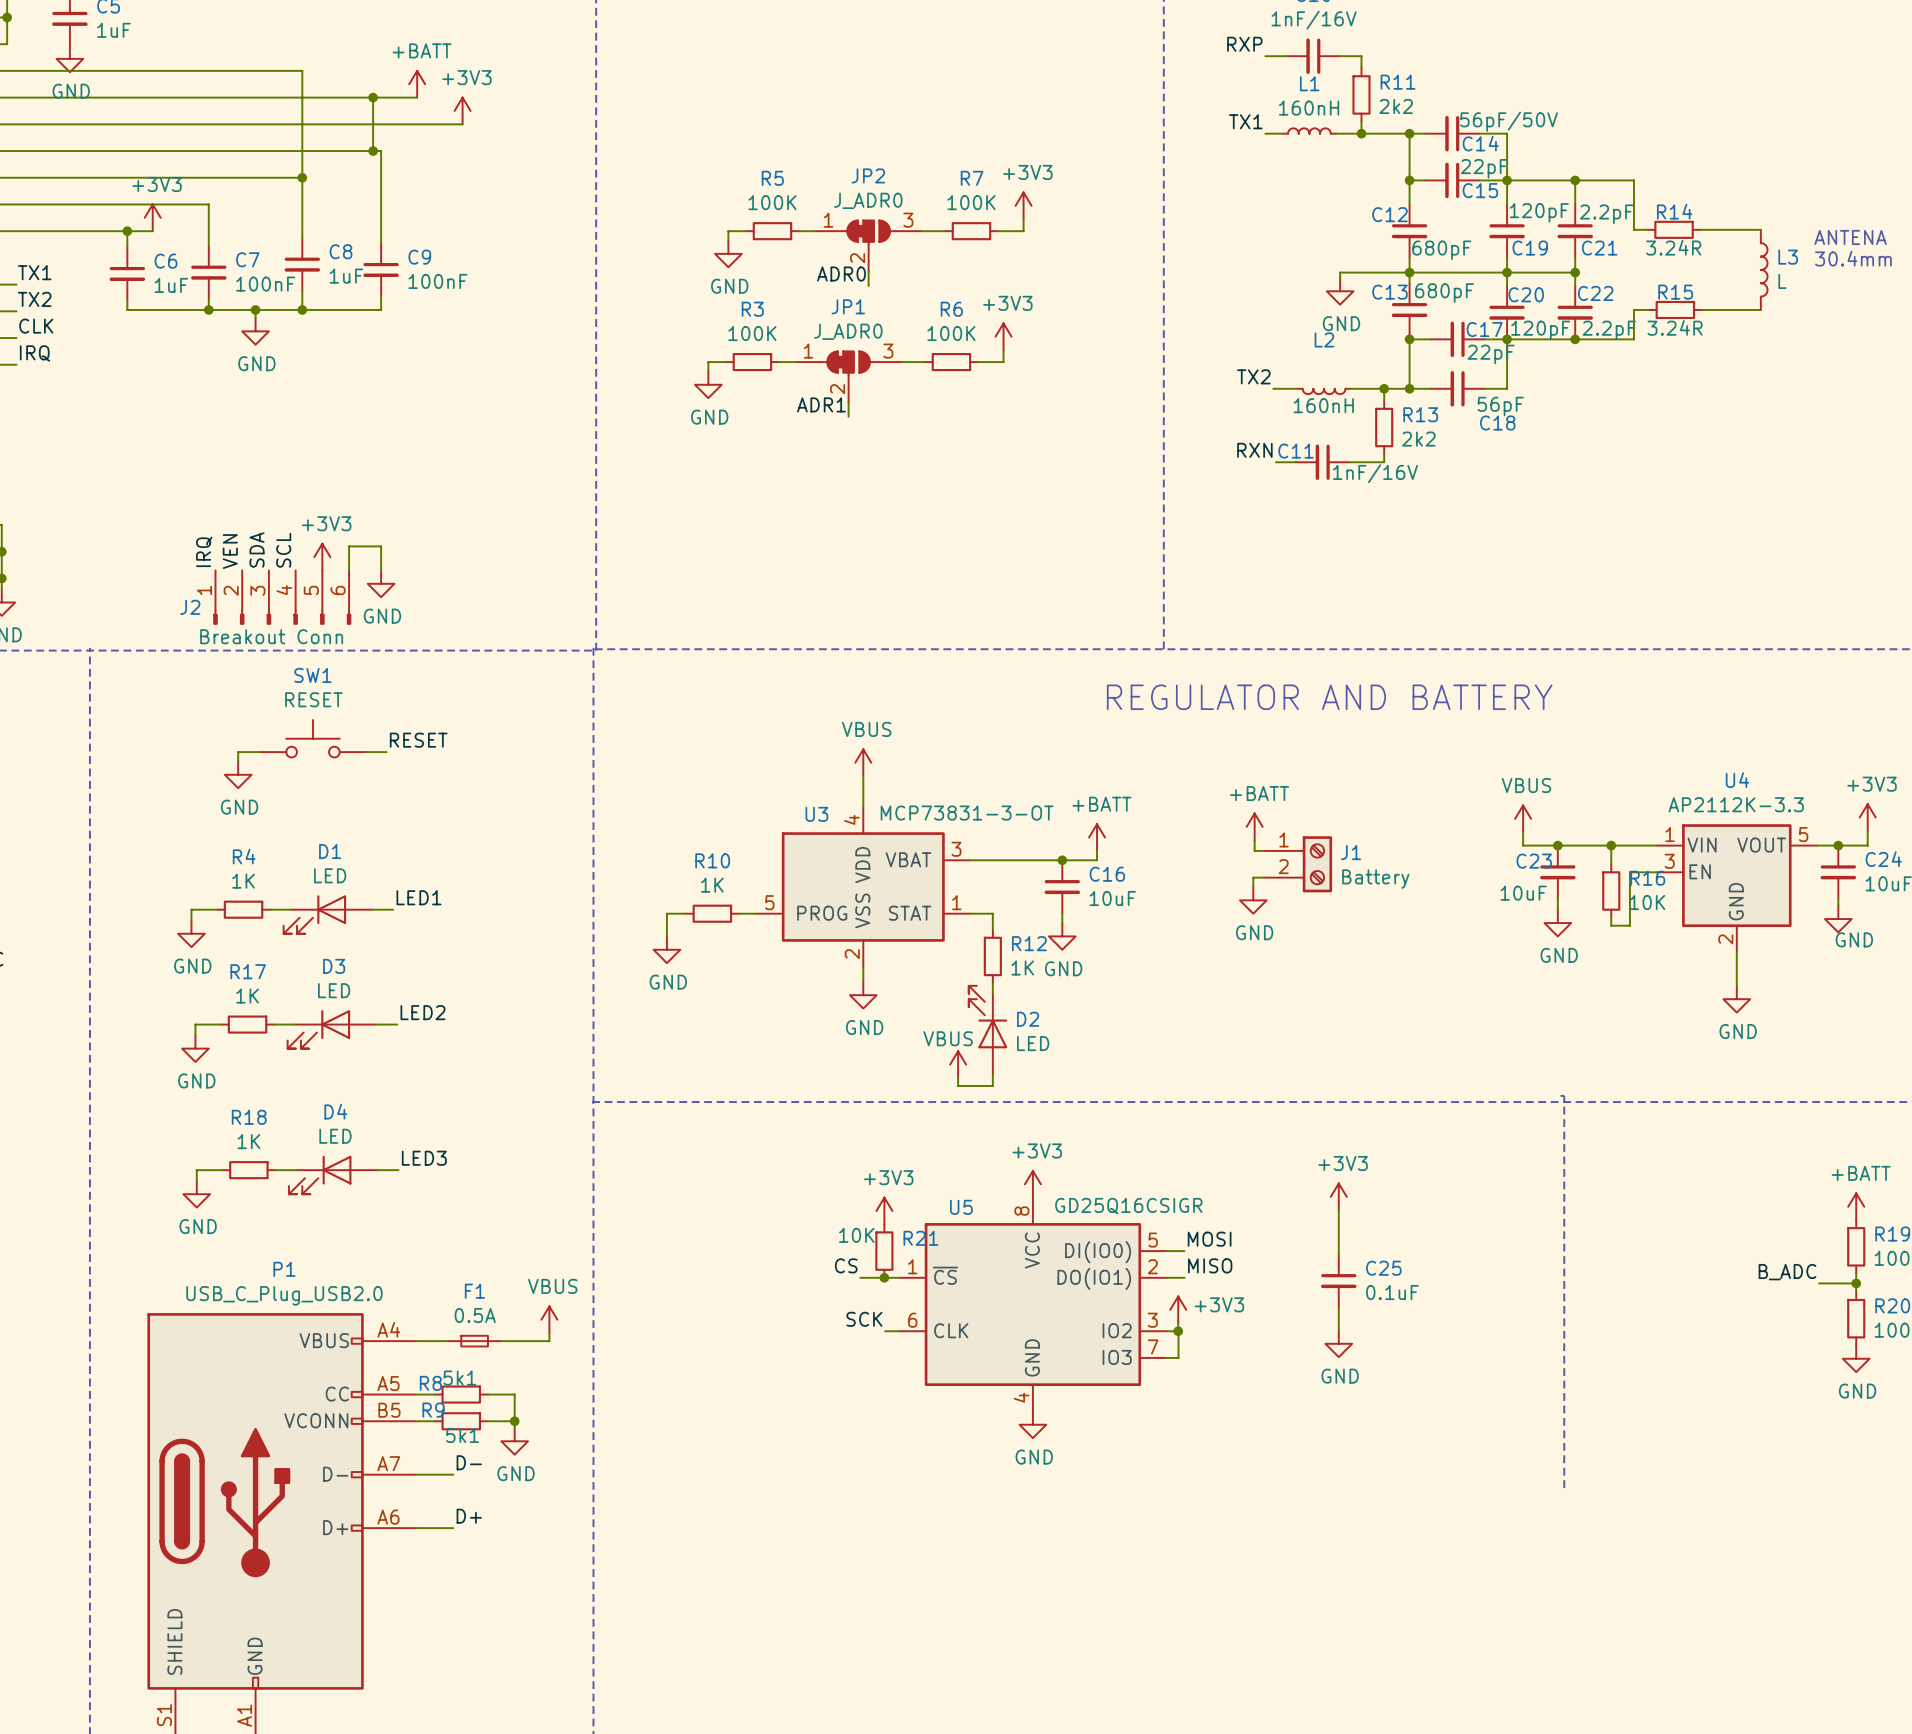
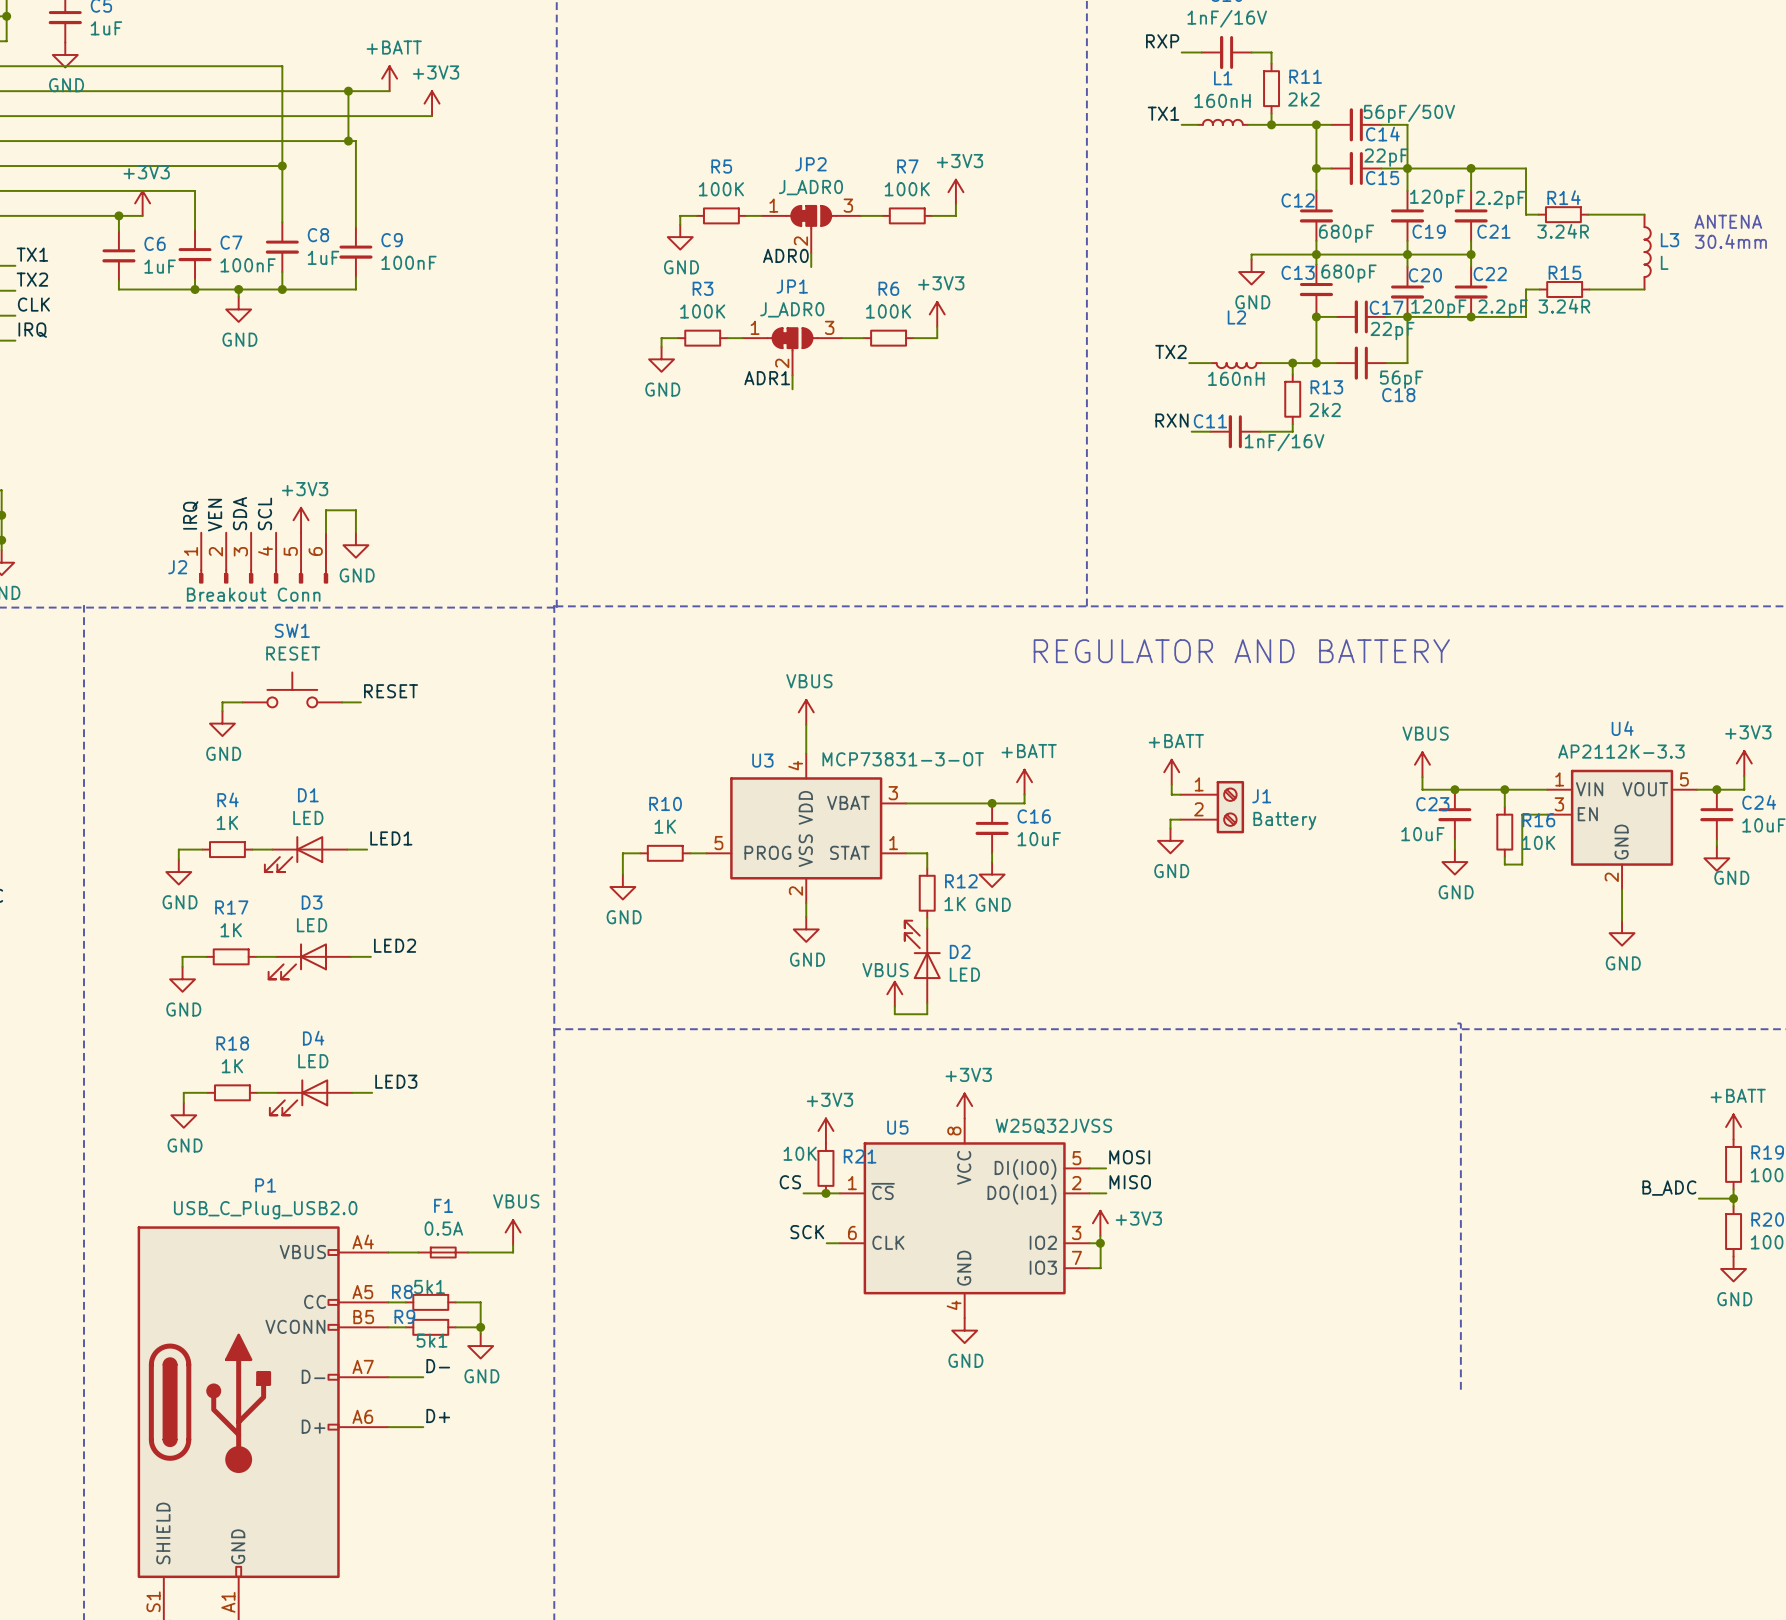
power symbol: +3V3 (1338, 1196) -> none
U5 value: GD25Q16CSIGR (1128, 1206) -> W25Q32JVSS (1053, 1126)
wire: (1338, 1210) (1338, 1254) -> none
C25: 0.1uF (1338, 1281) -> none
wire: (1338, 1307) (1338, 1330) -> none
power symbol: GND (1338, 1343) -> none

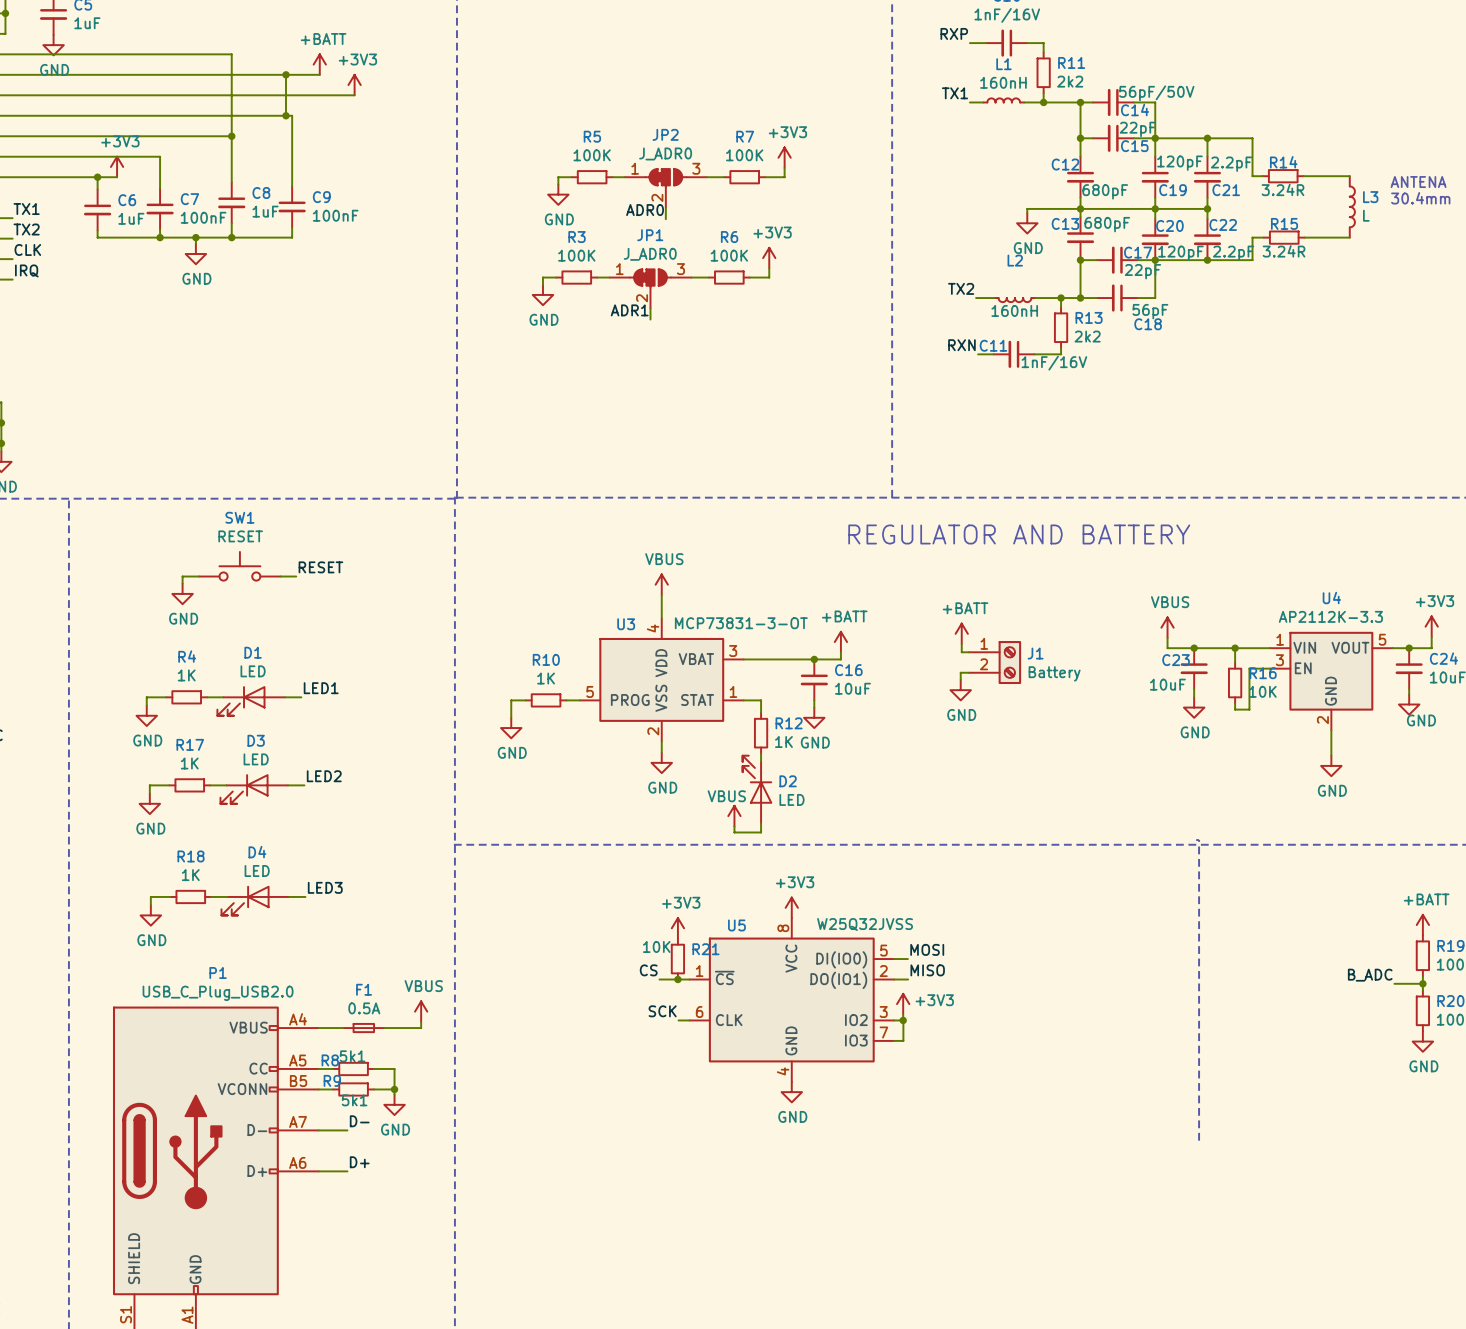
label: SDA (240, 513) -> none
label: SCL (264, 513) -> none
label: IRQ (190, 515) -> none
label: VEN (215, 515) -> none
power symbol: +3V3 (301, 520) -> none
wire: (325, 532) (325, 510) (355, 510) (355, 532) -> none
power symbol: GND (355, 545) -> none
J2: Breakout Conn (263, 558) -> none

